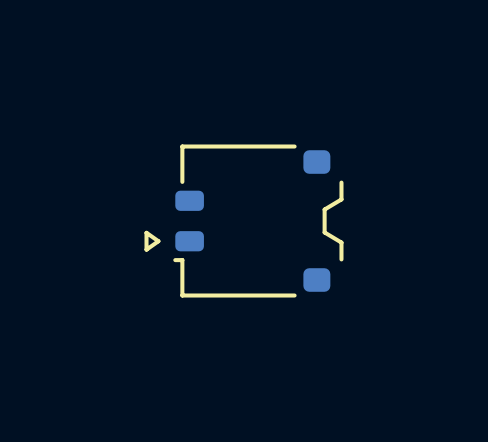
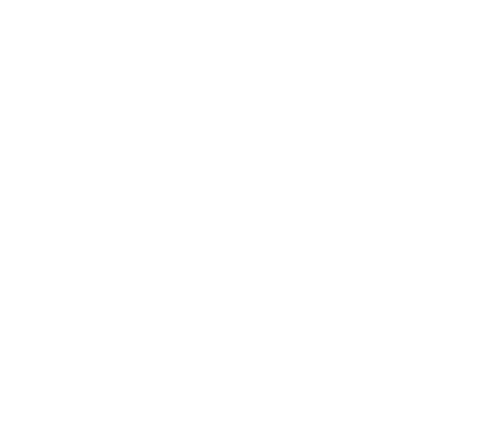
part: (243, 221) -> none

